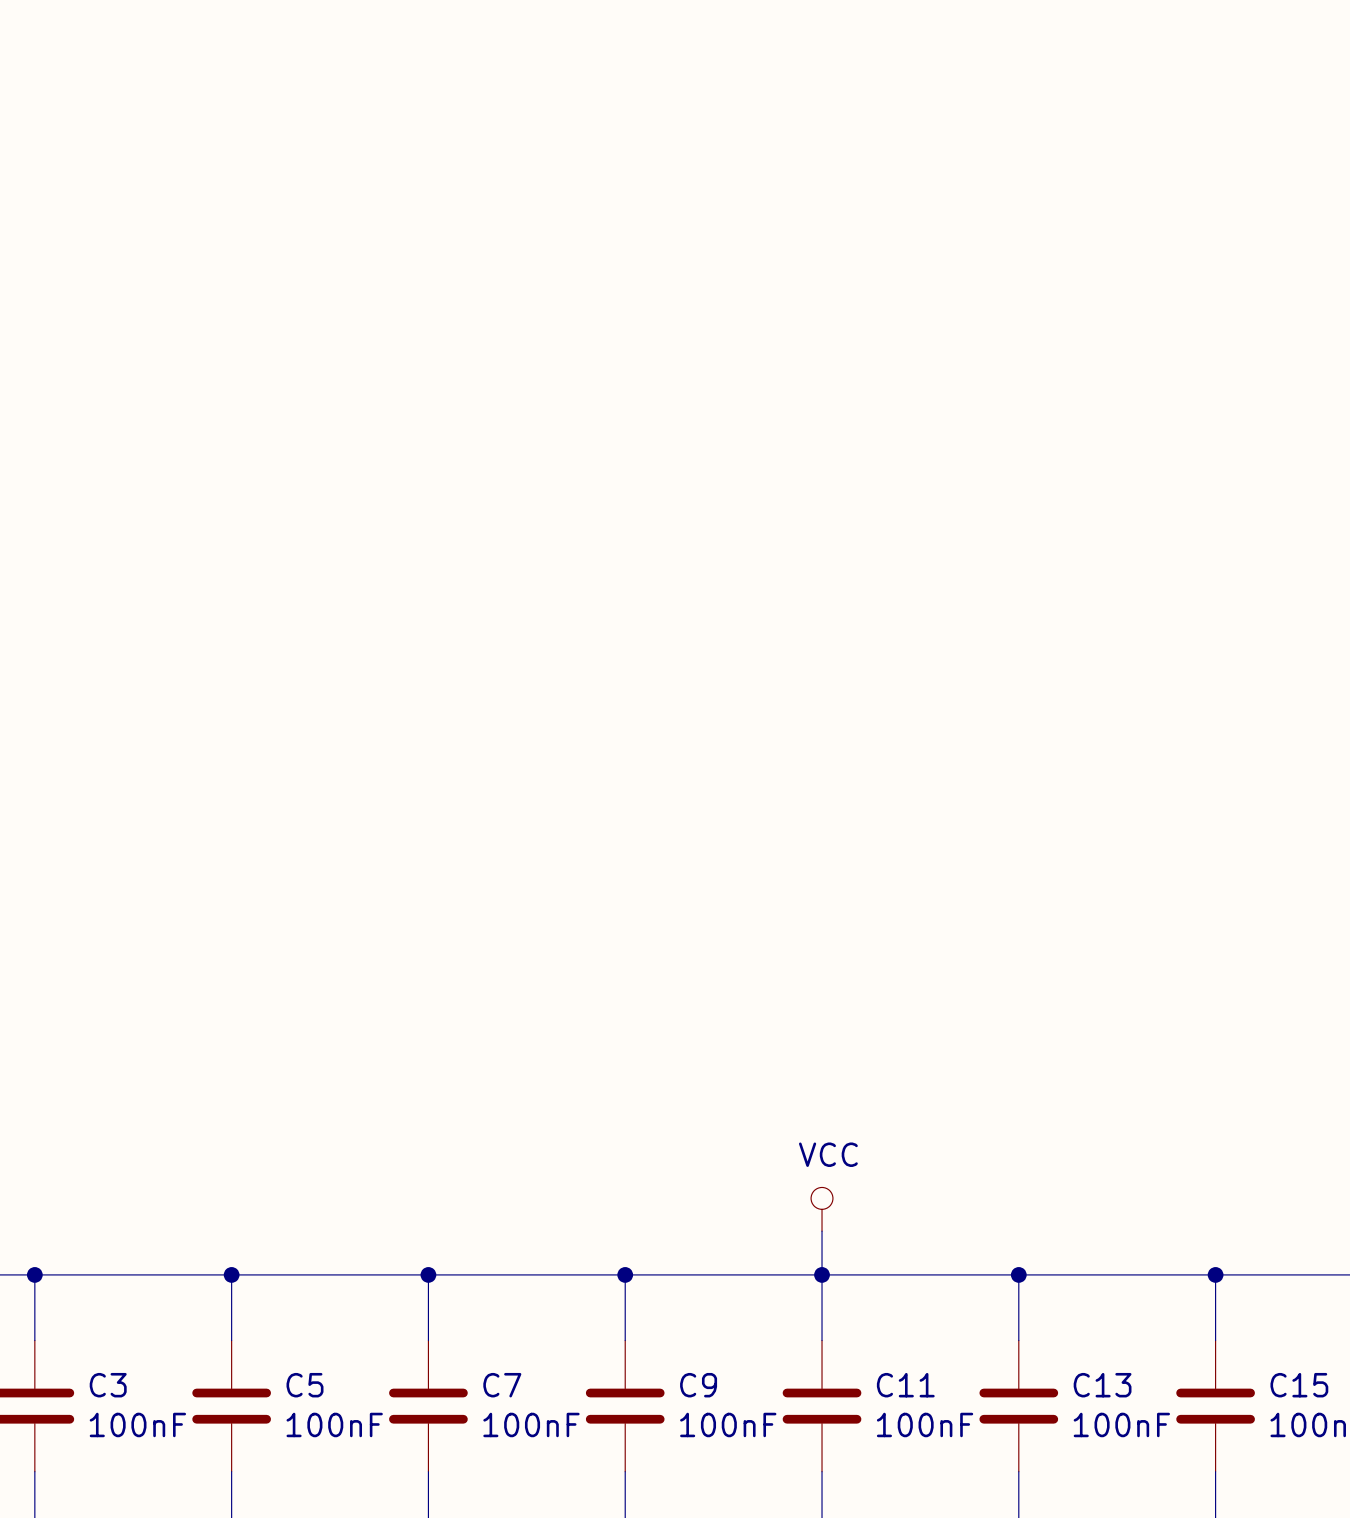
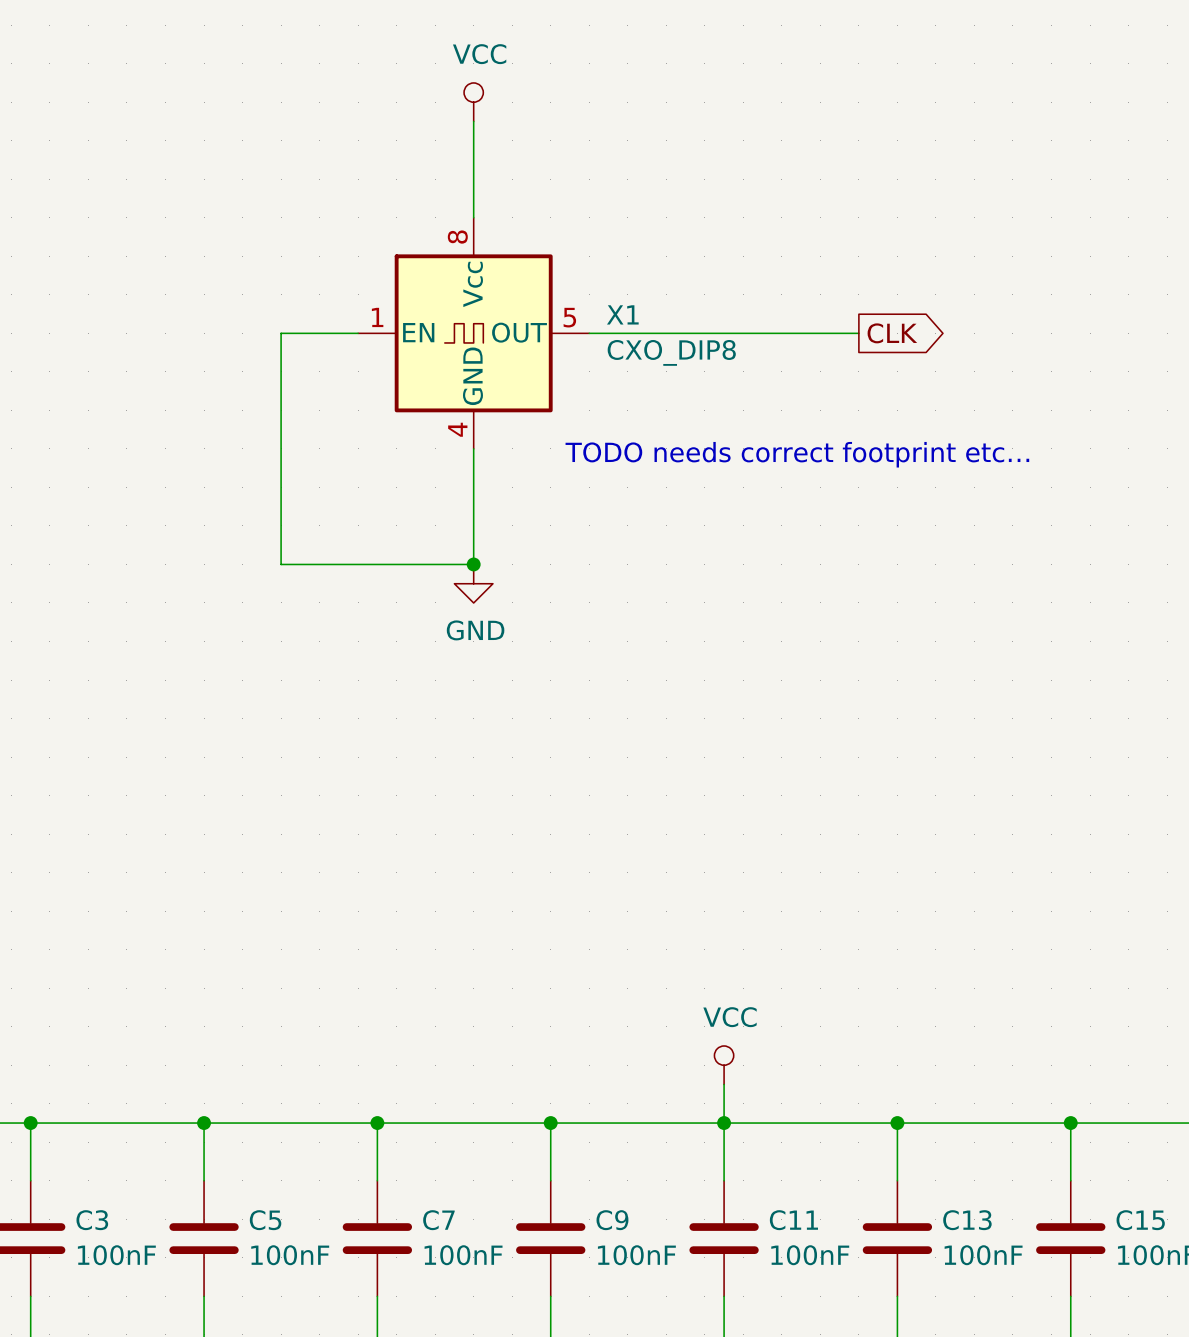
power symbol: none -> VCC (473, 102)
wire: none -> (473, 121) (473, 217)
wire: none -> (358, 333) (281, 333) (281, 564) (473, 564) (473, 448)
X1: none -> CXO_DIP8 (473, 333)
wire: none -> (589, 333) (858, 333)
global label: none -> CLK (892, 333)
text: none -> TODO needs correct footprint etc… (797, 454)
junction: none -> (473, 564)
power symbol: none -> GND (473, 583)

